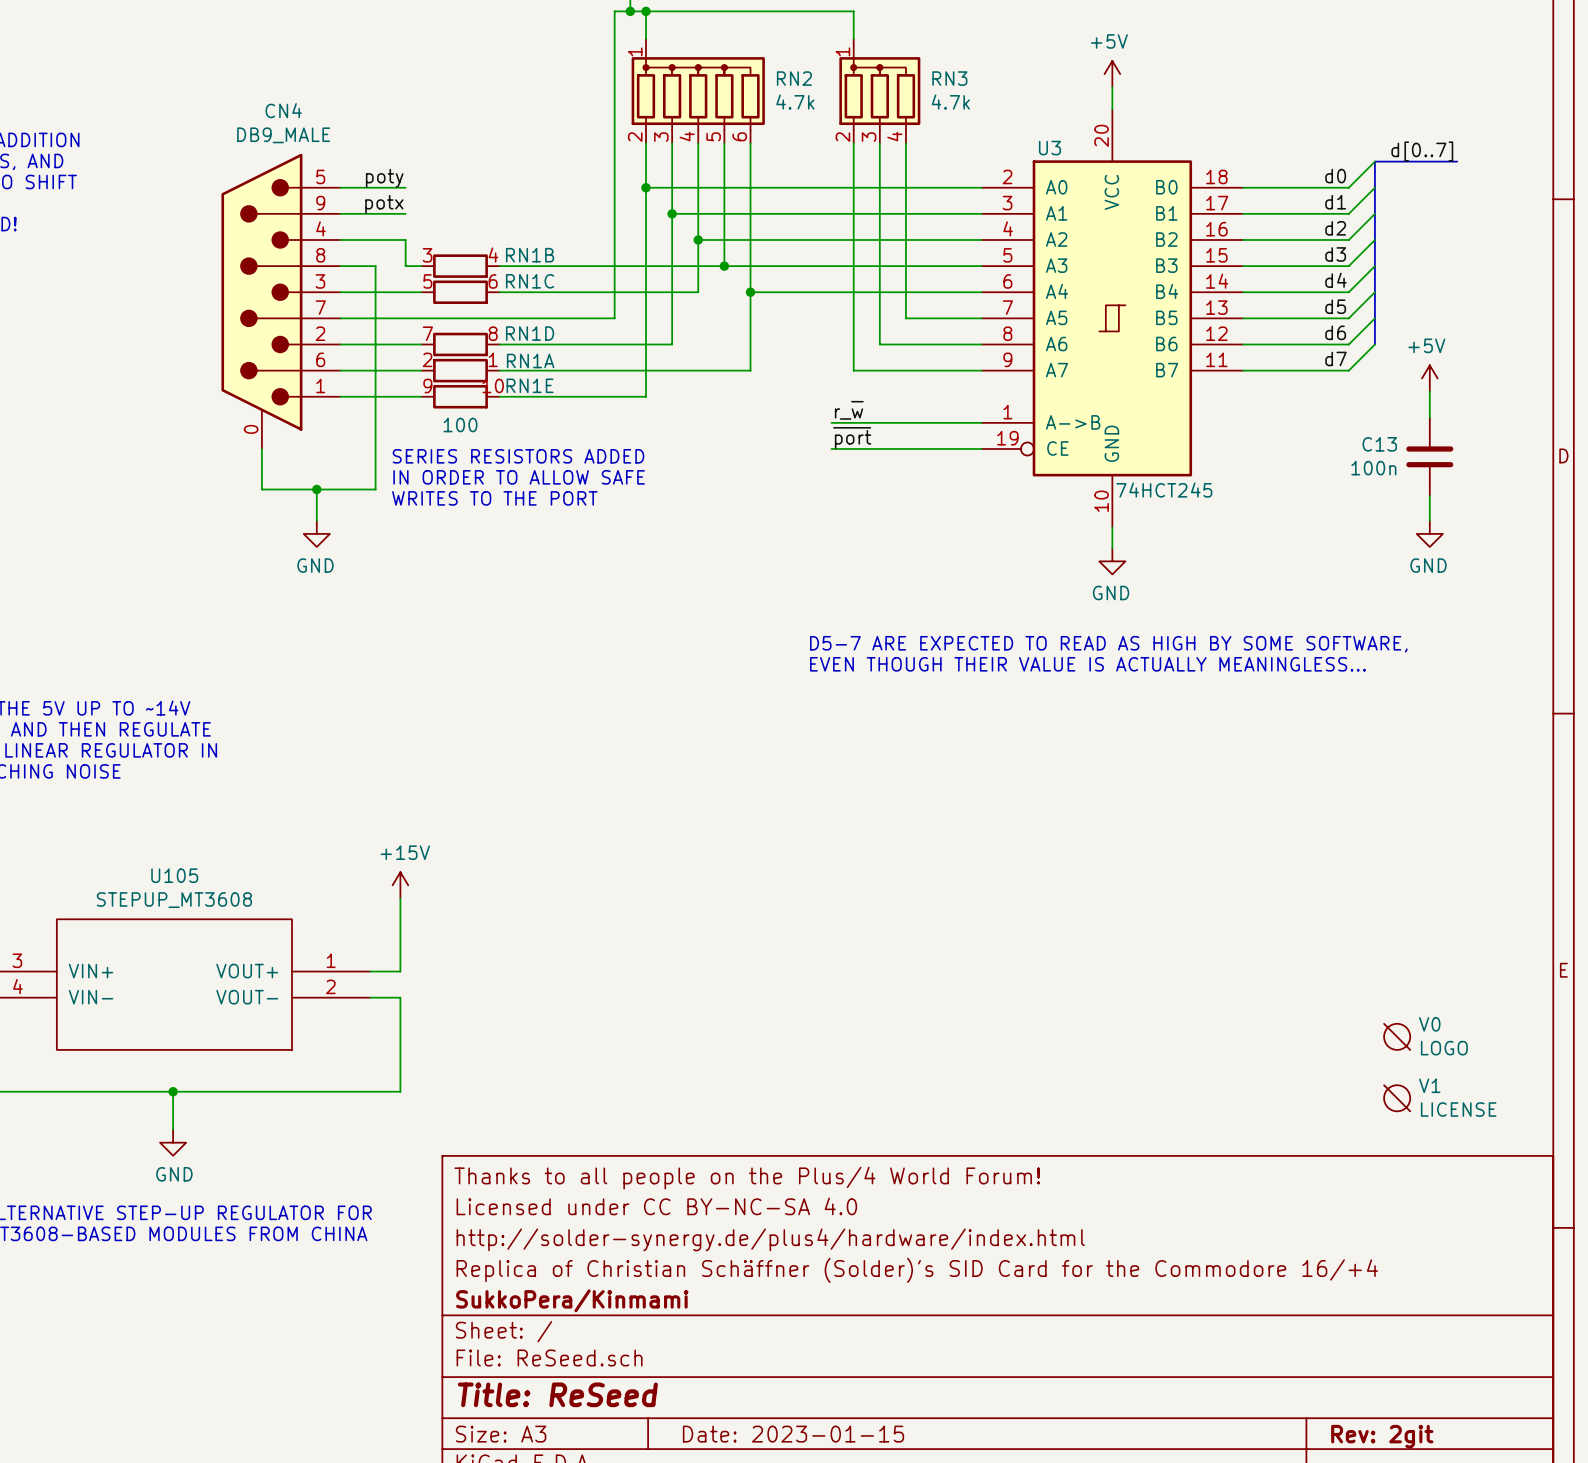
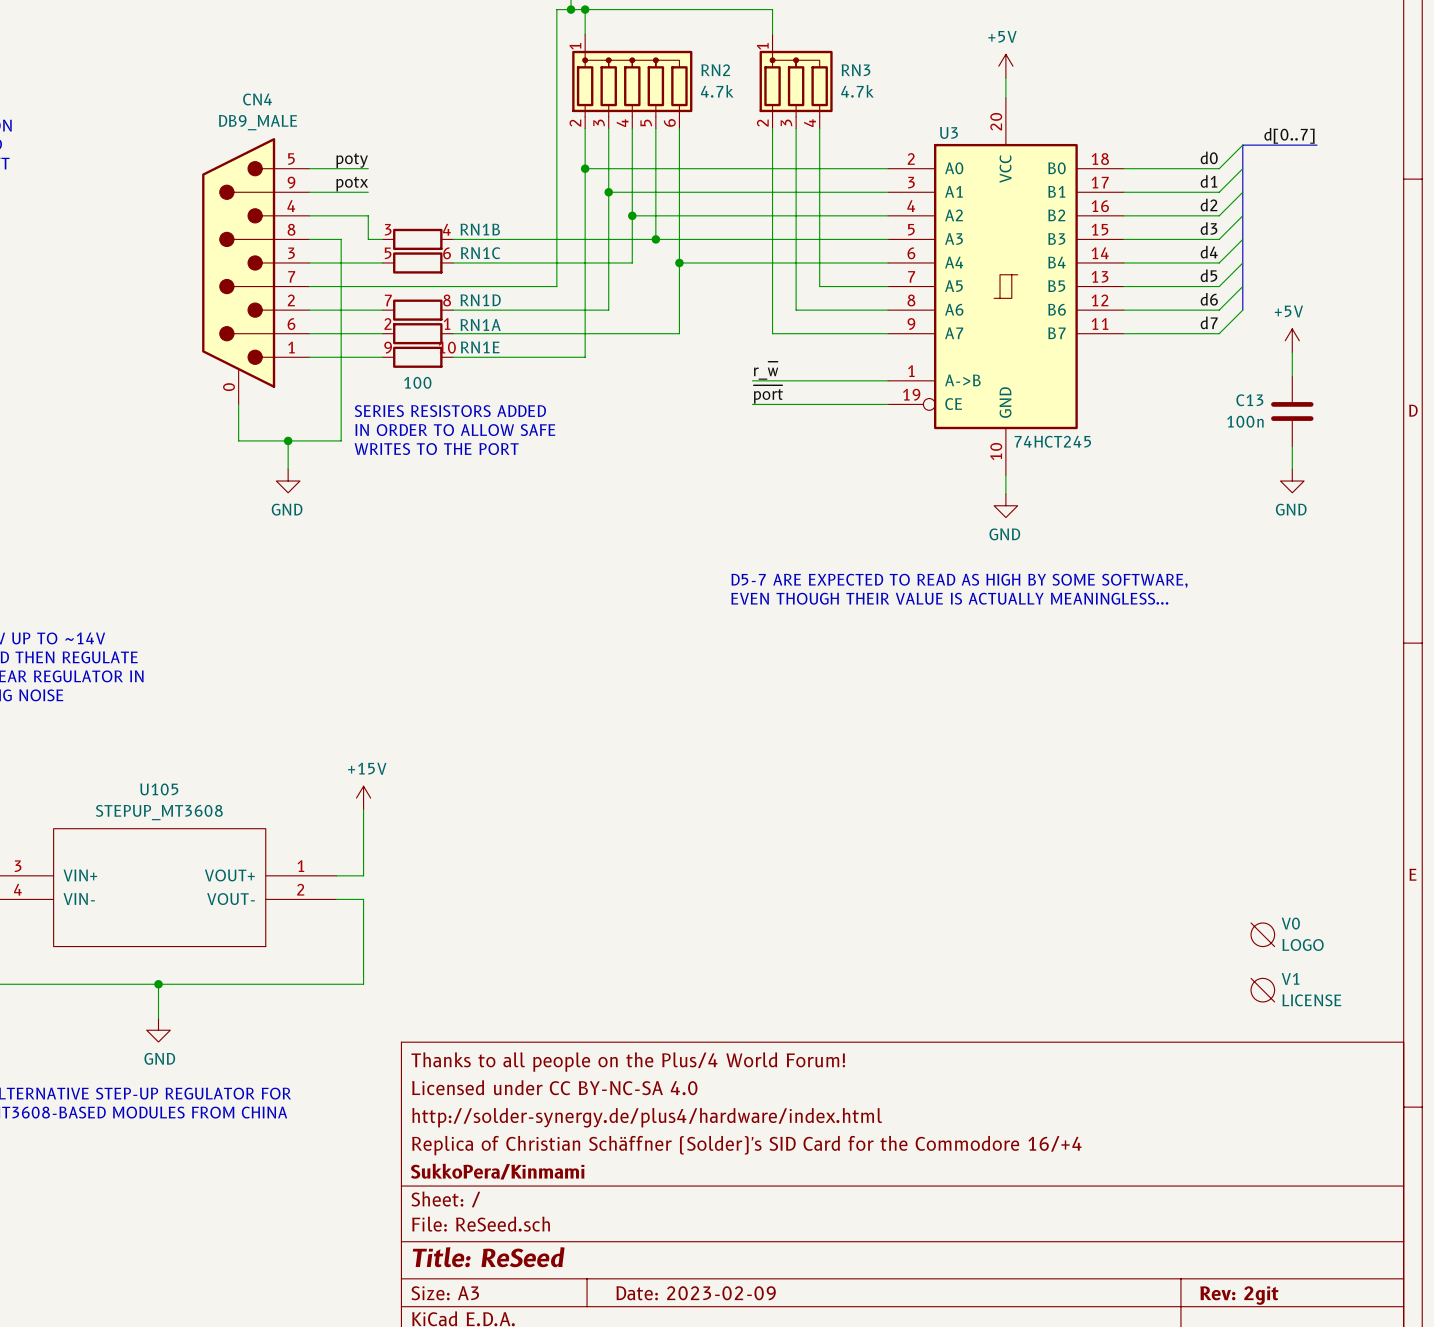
title block: Date: 2023-01-15 (793, 1434) -> Date: 2023-02-09 (696, 1293)

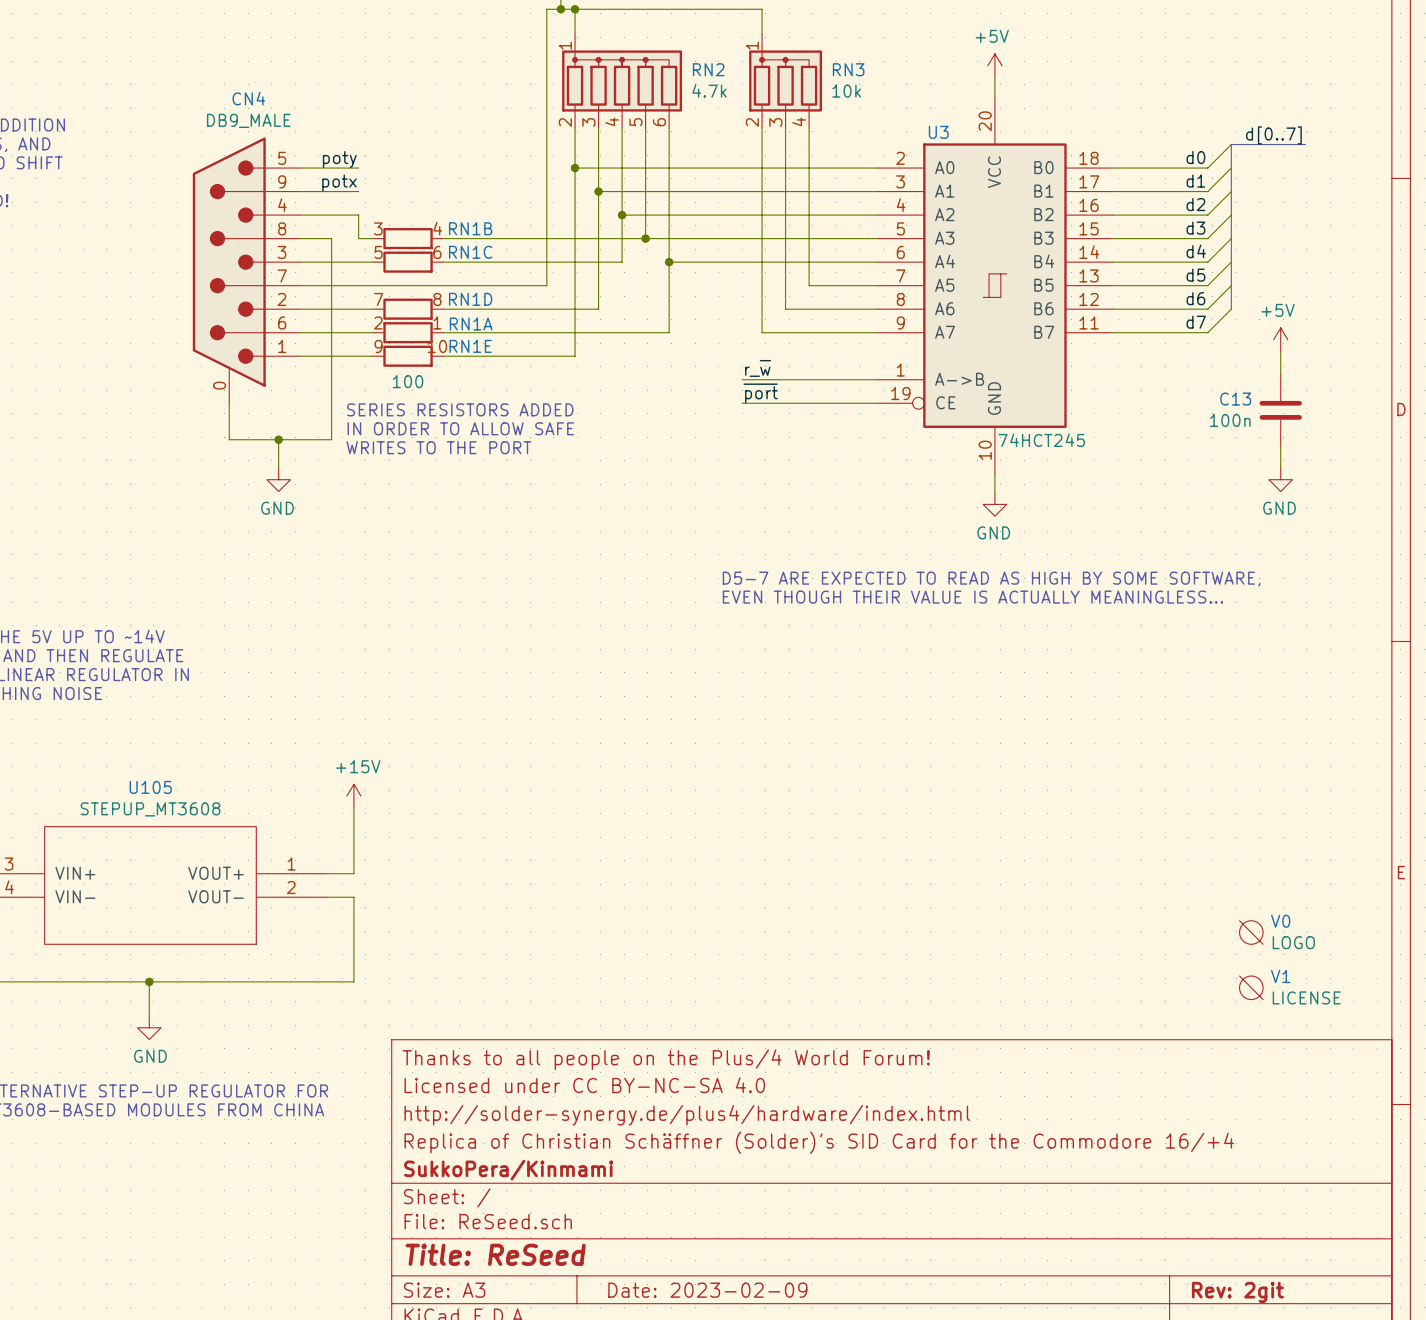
RN3 value: 4.7k (857, 91) -> 10k (846, 91)

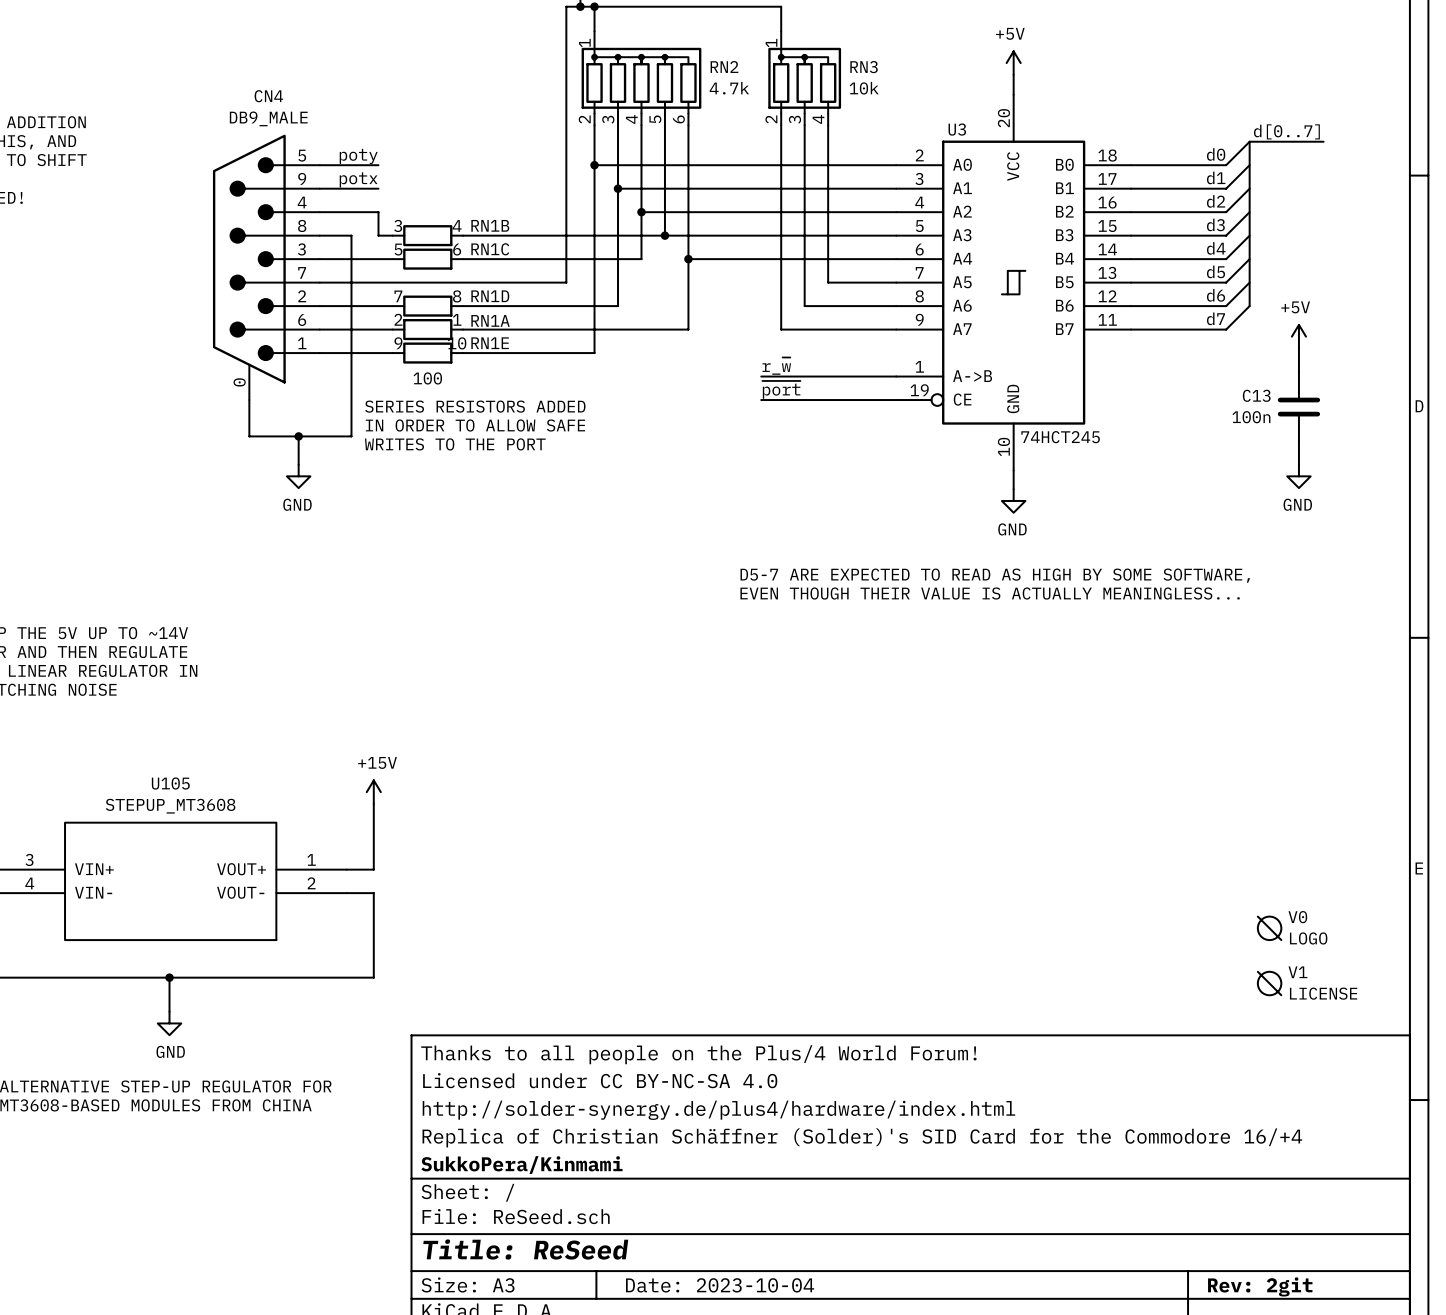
title block: Date: 2023-02-09 (707, 1290) -> Date: 2023-10-04 (720, 1285)

